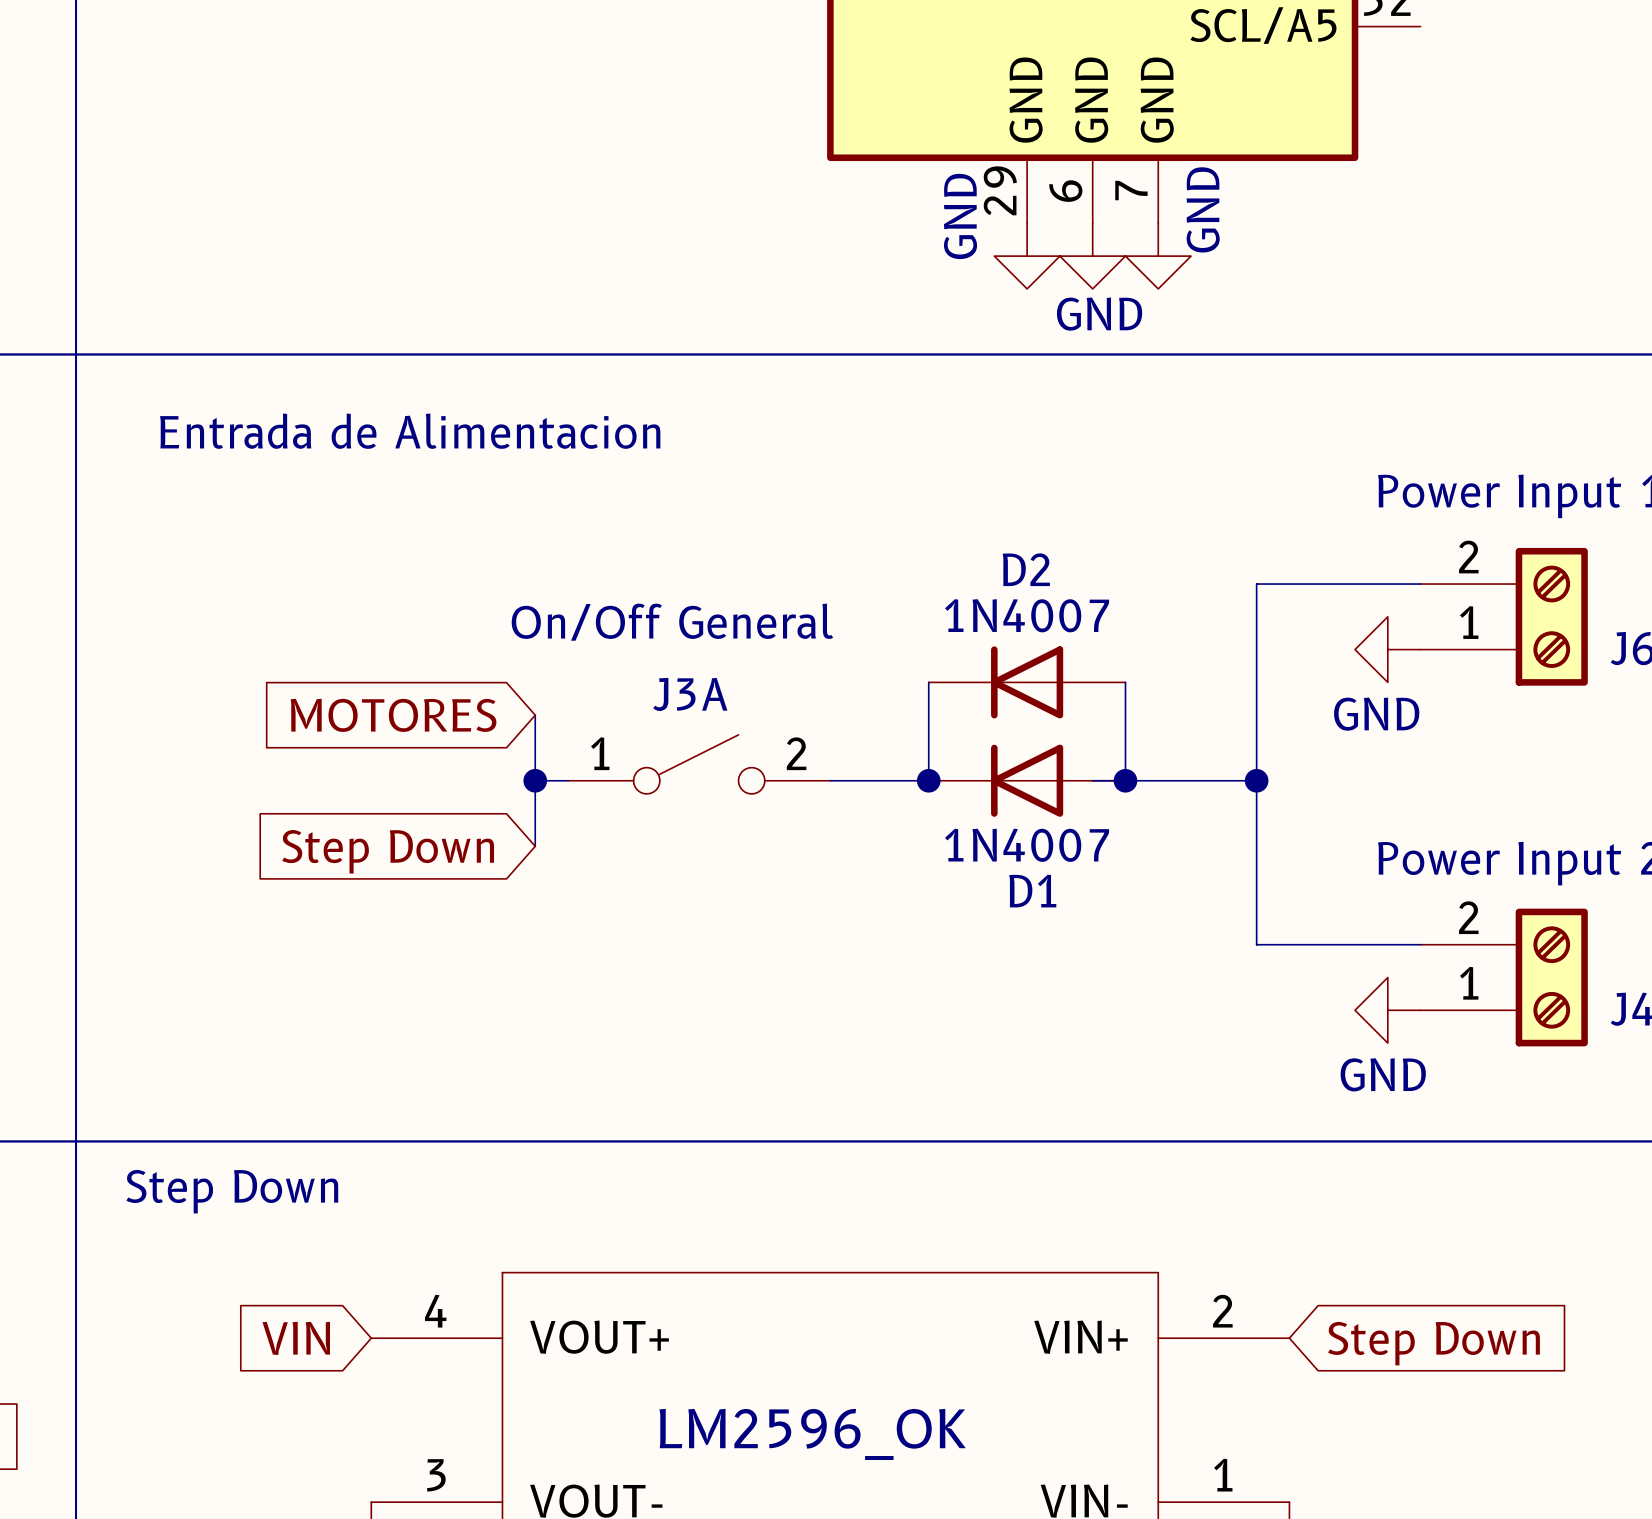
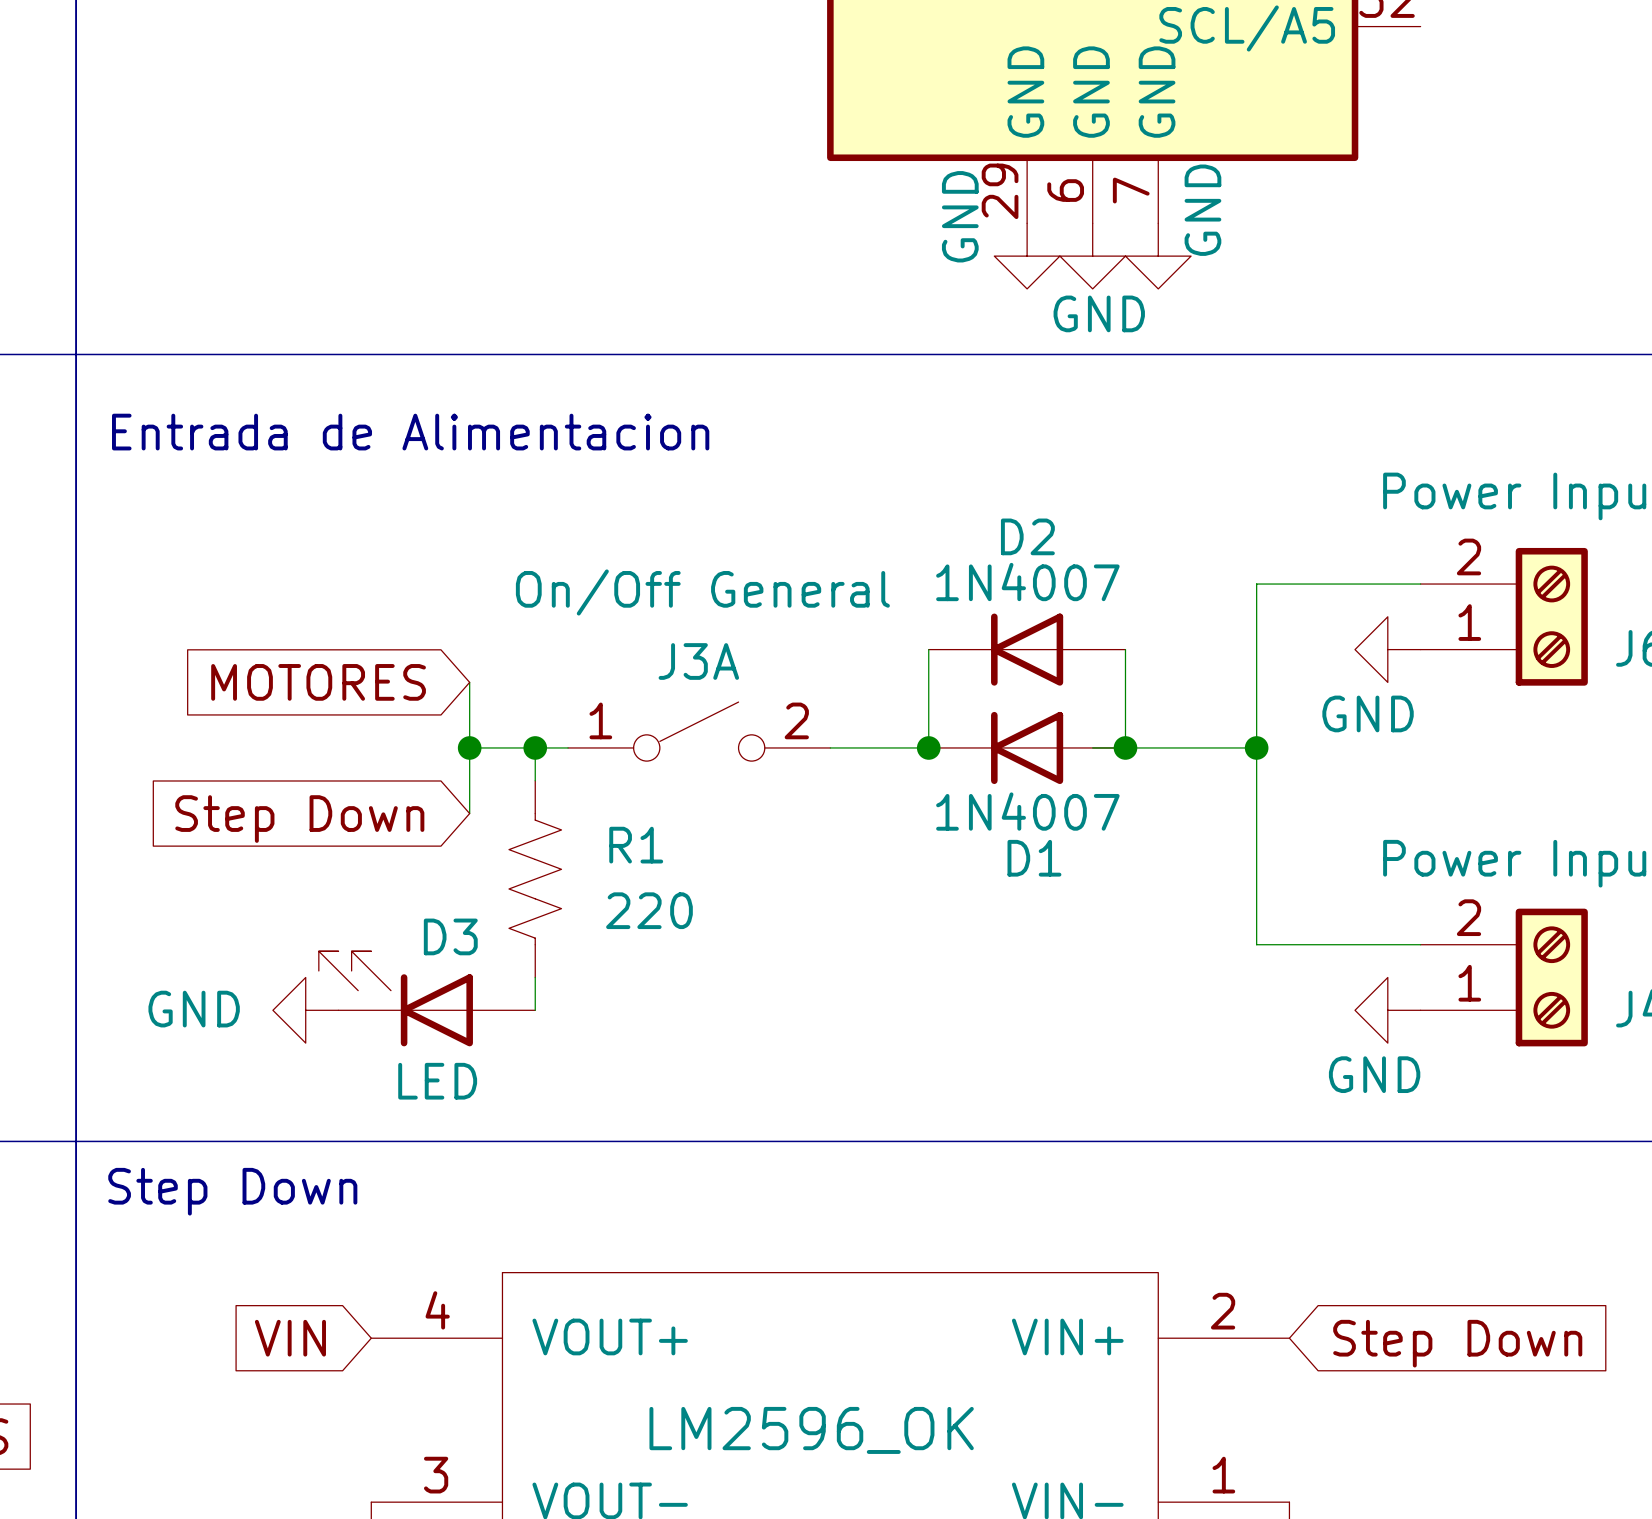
wire: none -> (928, 649) (928, 682)
wire: none -> (469, 682) (469, 813)
D2 position: (1027, 682) -> (1027, 649)
global label position: MOTORES (393, 715) -> MOTORES (318, 682)
wire: (535, 715) (535, 747) -> (535, 977) (535, 1010)
wire: none -> (469, 747) (568, 747)
junction: none -> (469, 747)
wire: (928, 747) (928, 780) (830, 780) -> (928, 747) (830, 747)
wire: (1125, 747) (1125, 780) -> (1125, 649) (1125, 682)
J3A position: (699, 764) -> (699, 731)
junction position: (535, 780) -> (535, 747)
wire: (568, 780) (535, 780) (535, 846) -> none
junction position: (928, 780) -> (928, 747)
D1 position: (1027, 780) -> (1027, 747)
wire: (1092, 780) (1256, 780) -> (1092, 747) (1256, 747)
junction position: (1125, 780) -> (1125, 747)
junction position: (1256, 780) -> (1256, 747)
global label position: Step Down (388, 851) -> Step Down (299, 819)
R1: none -> 220 (535, 879)
D3: none -> LED (427, 998)
power symbol: none -> GND (305, 1010)

